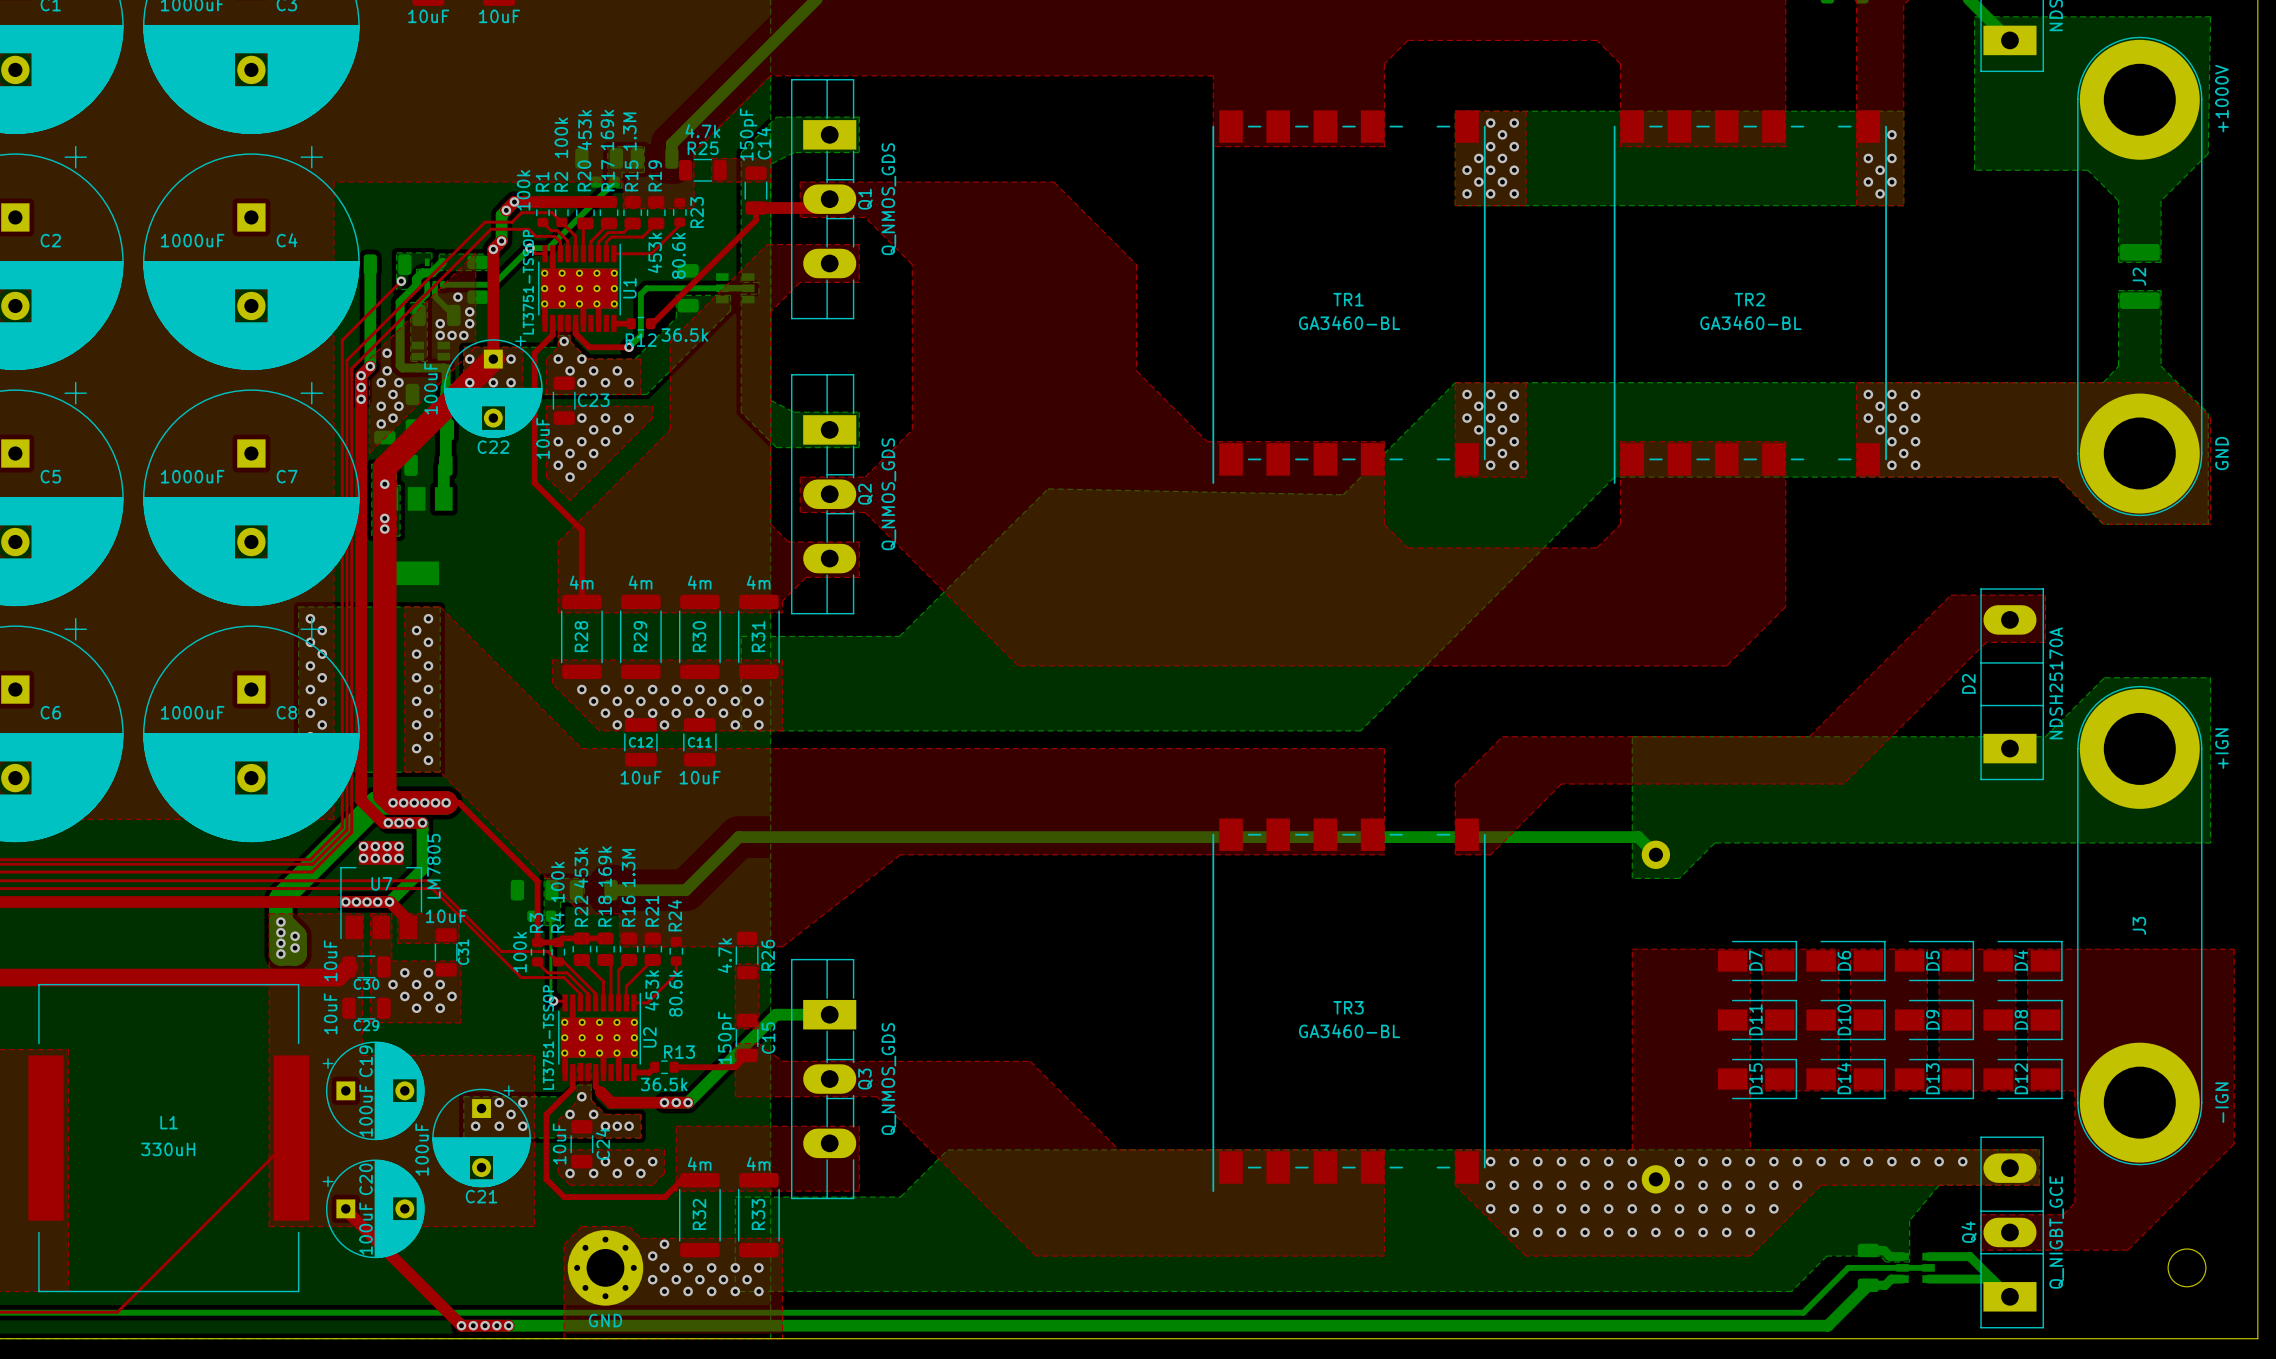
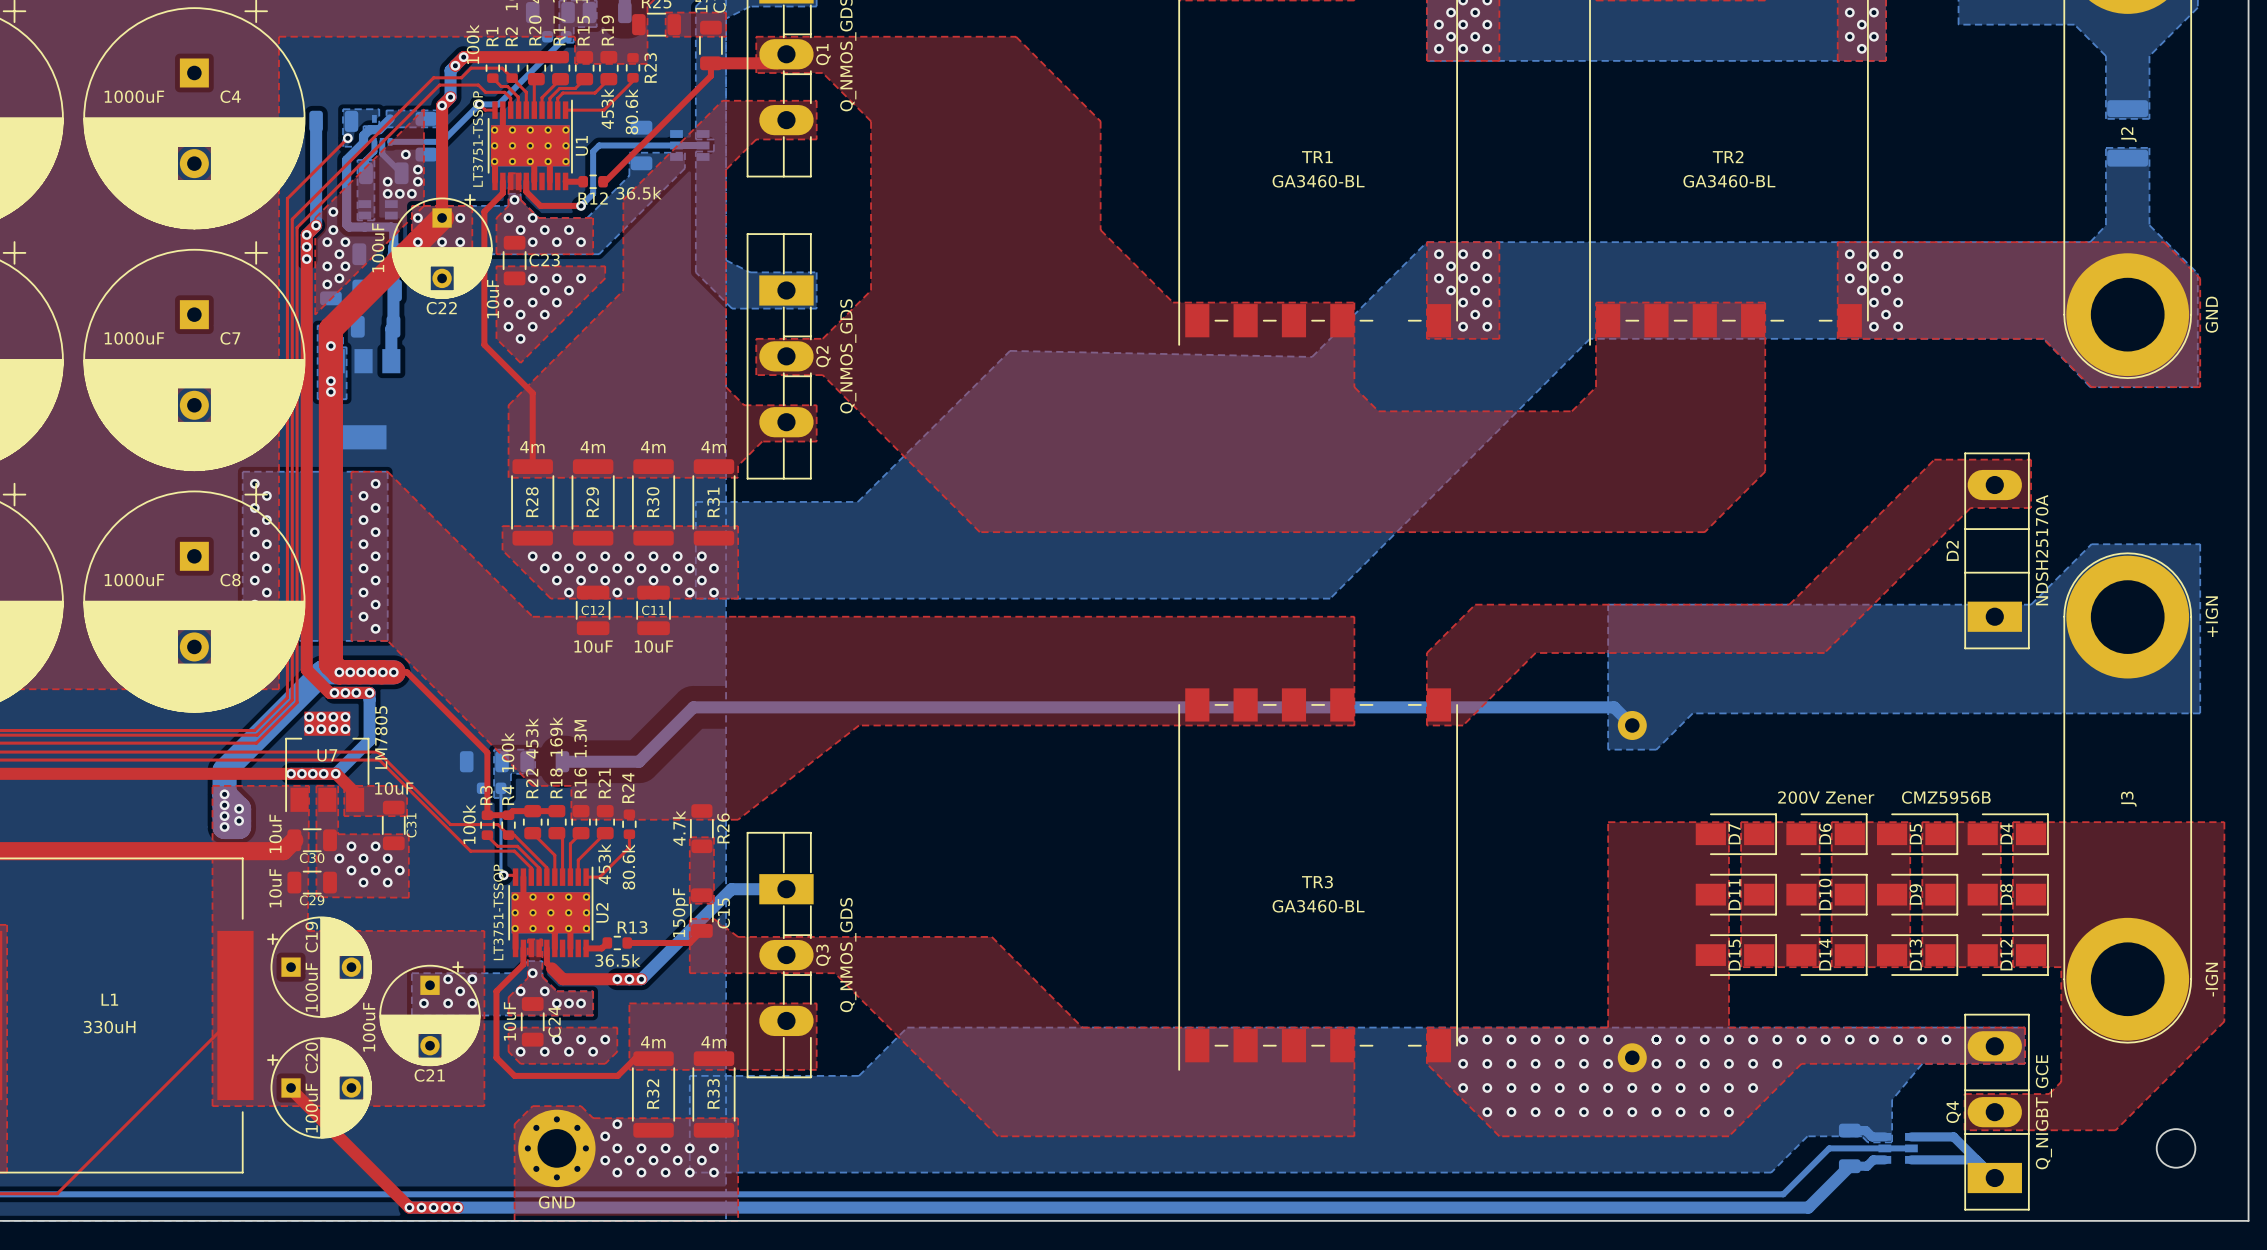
text: none -> 200V Zener (1826, 797)
D5 value: none -> CMZ5956B (1946, 797)

